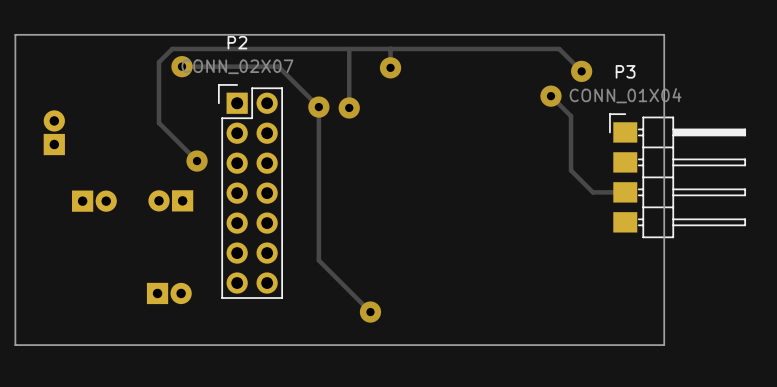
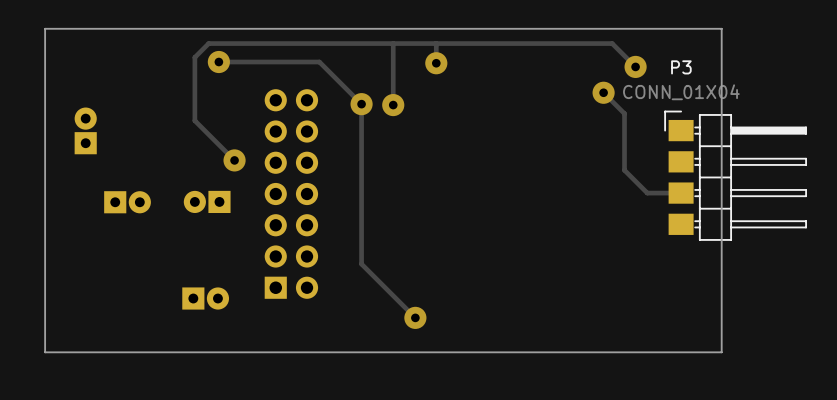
P2 side: bottom (250, 191) -> top (291, 194)

